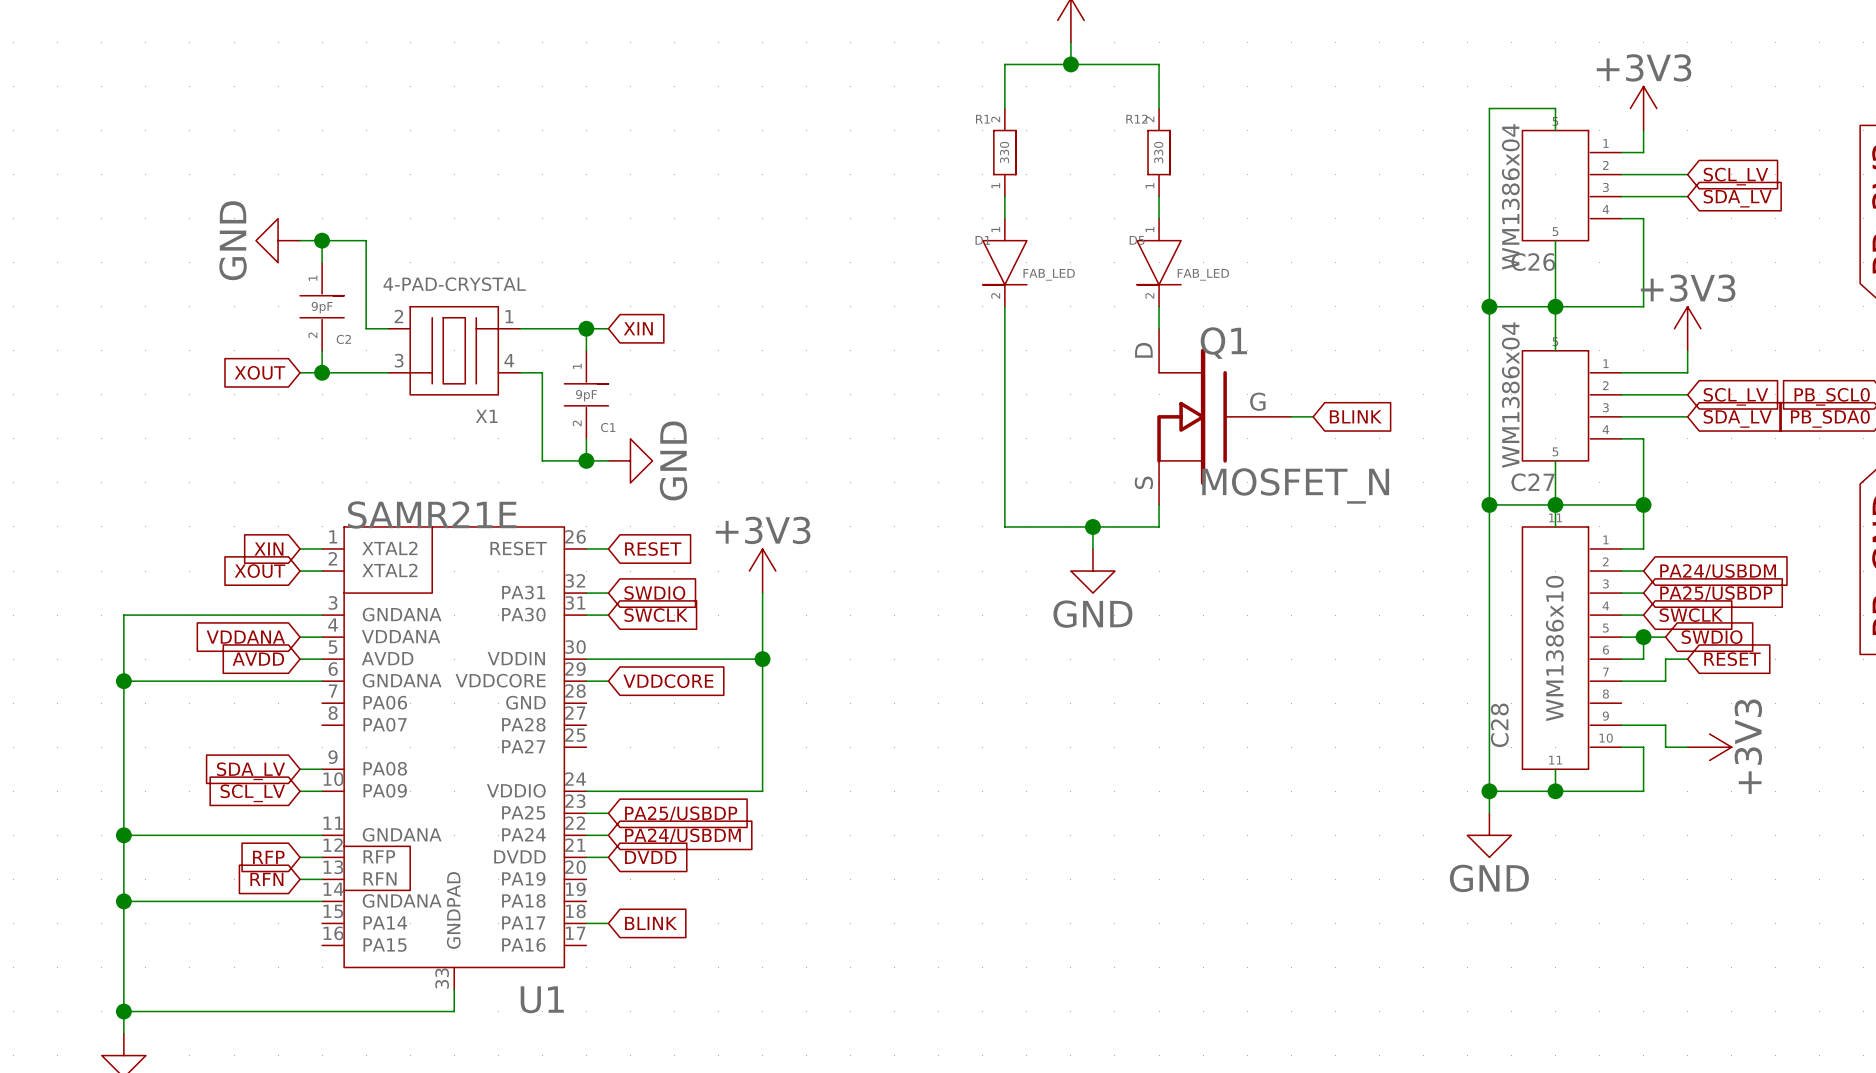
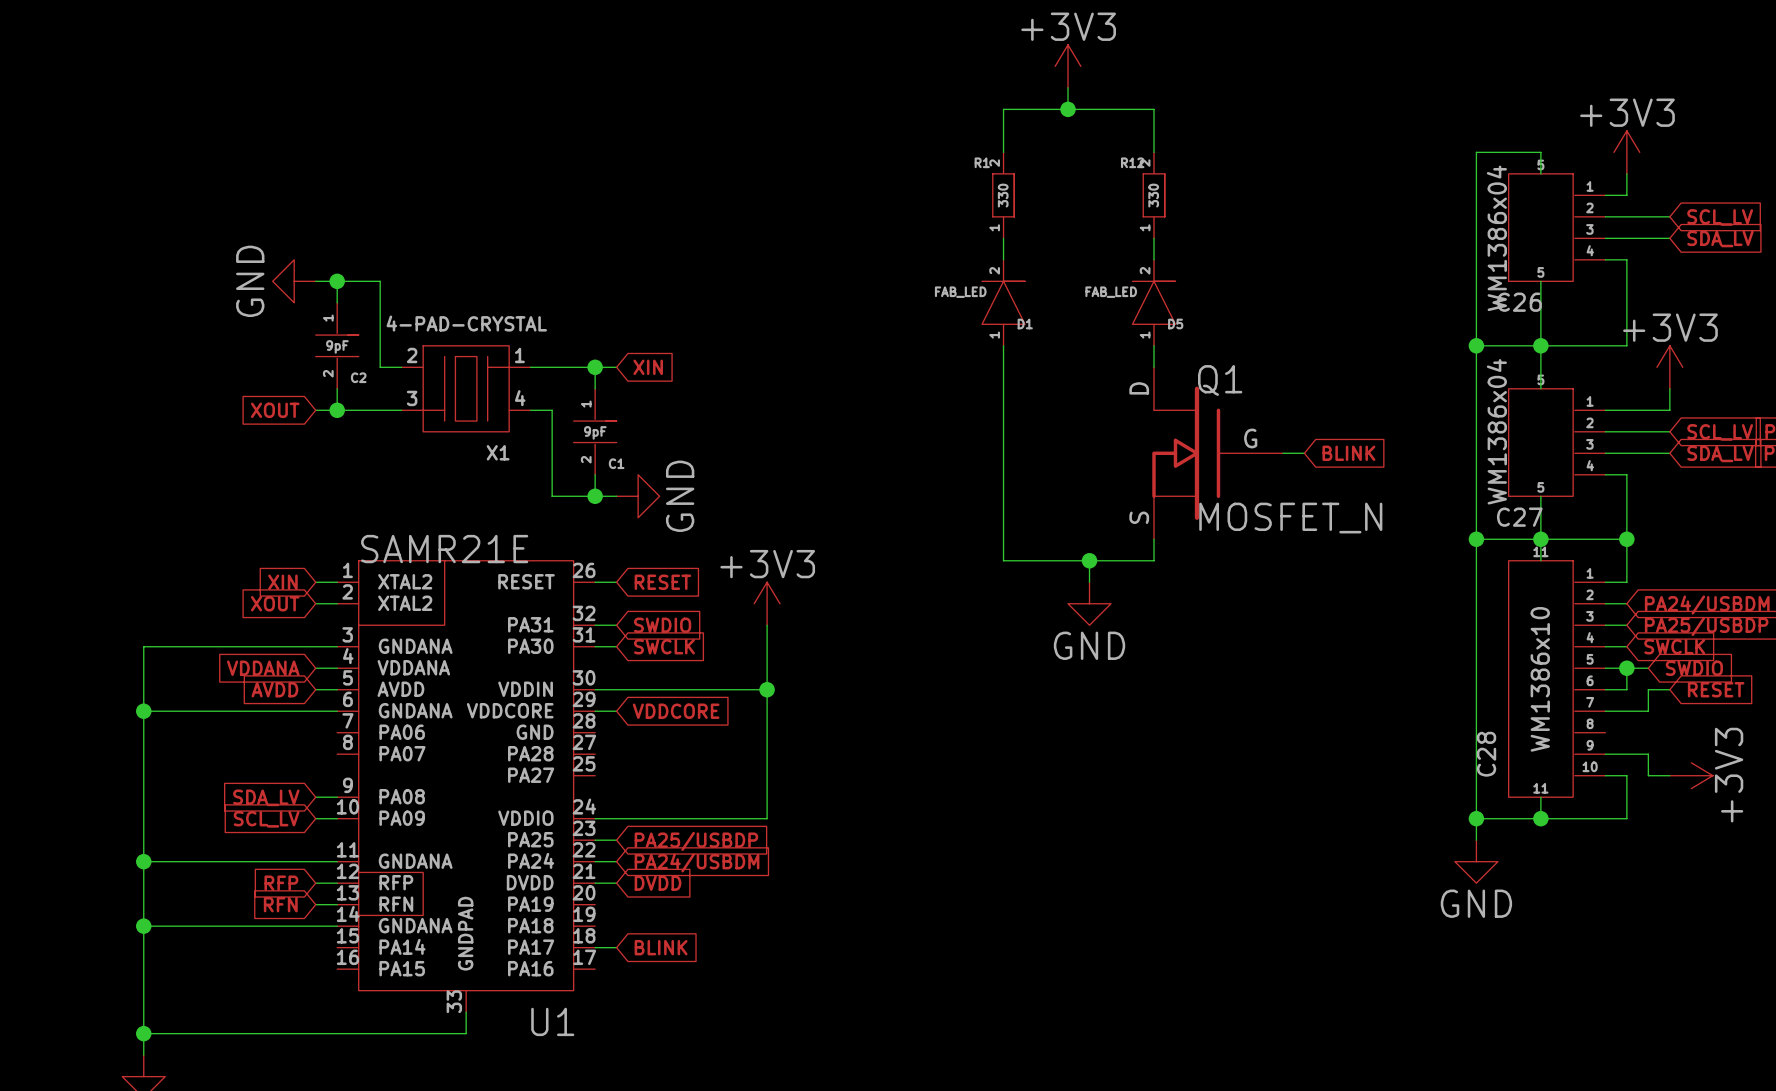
D1 rotation: 0° (1004, 262) -> 180° (1003, 302)
D5 rotation: 0° (1159, 262) -> 180° (1153, 302)

